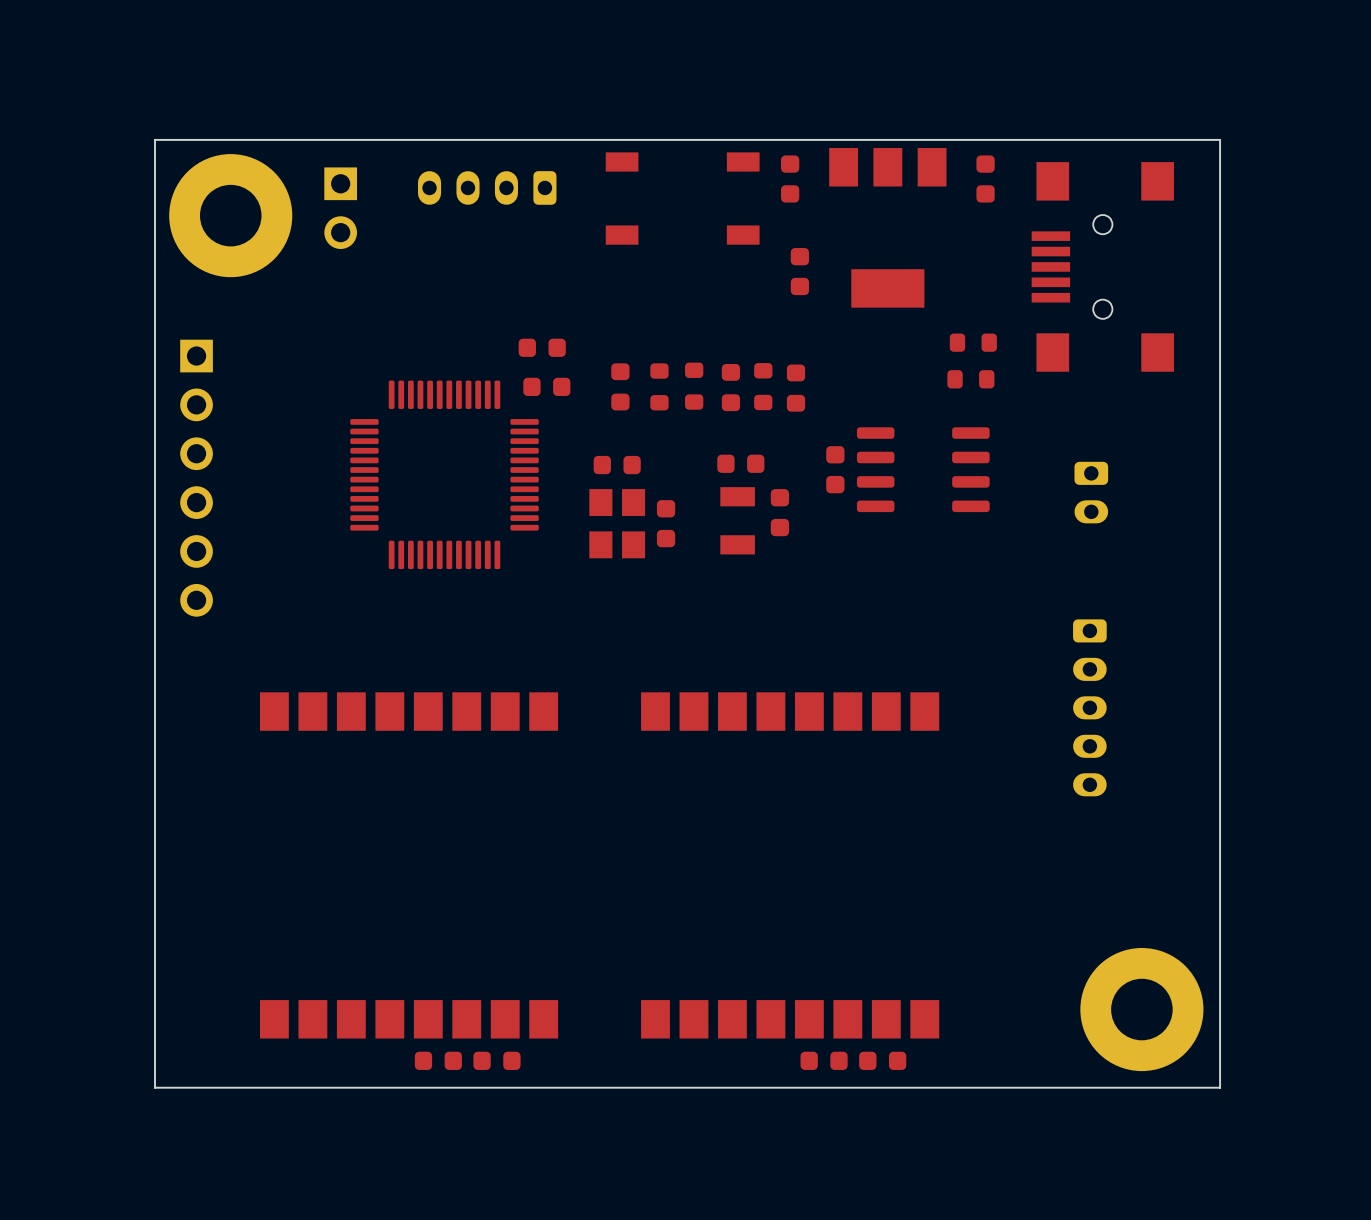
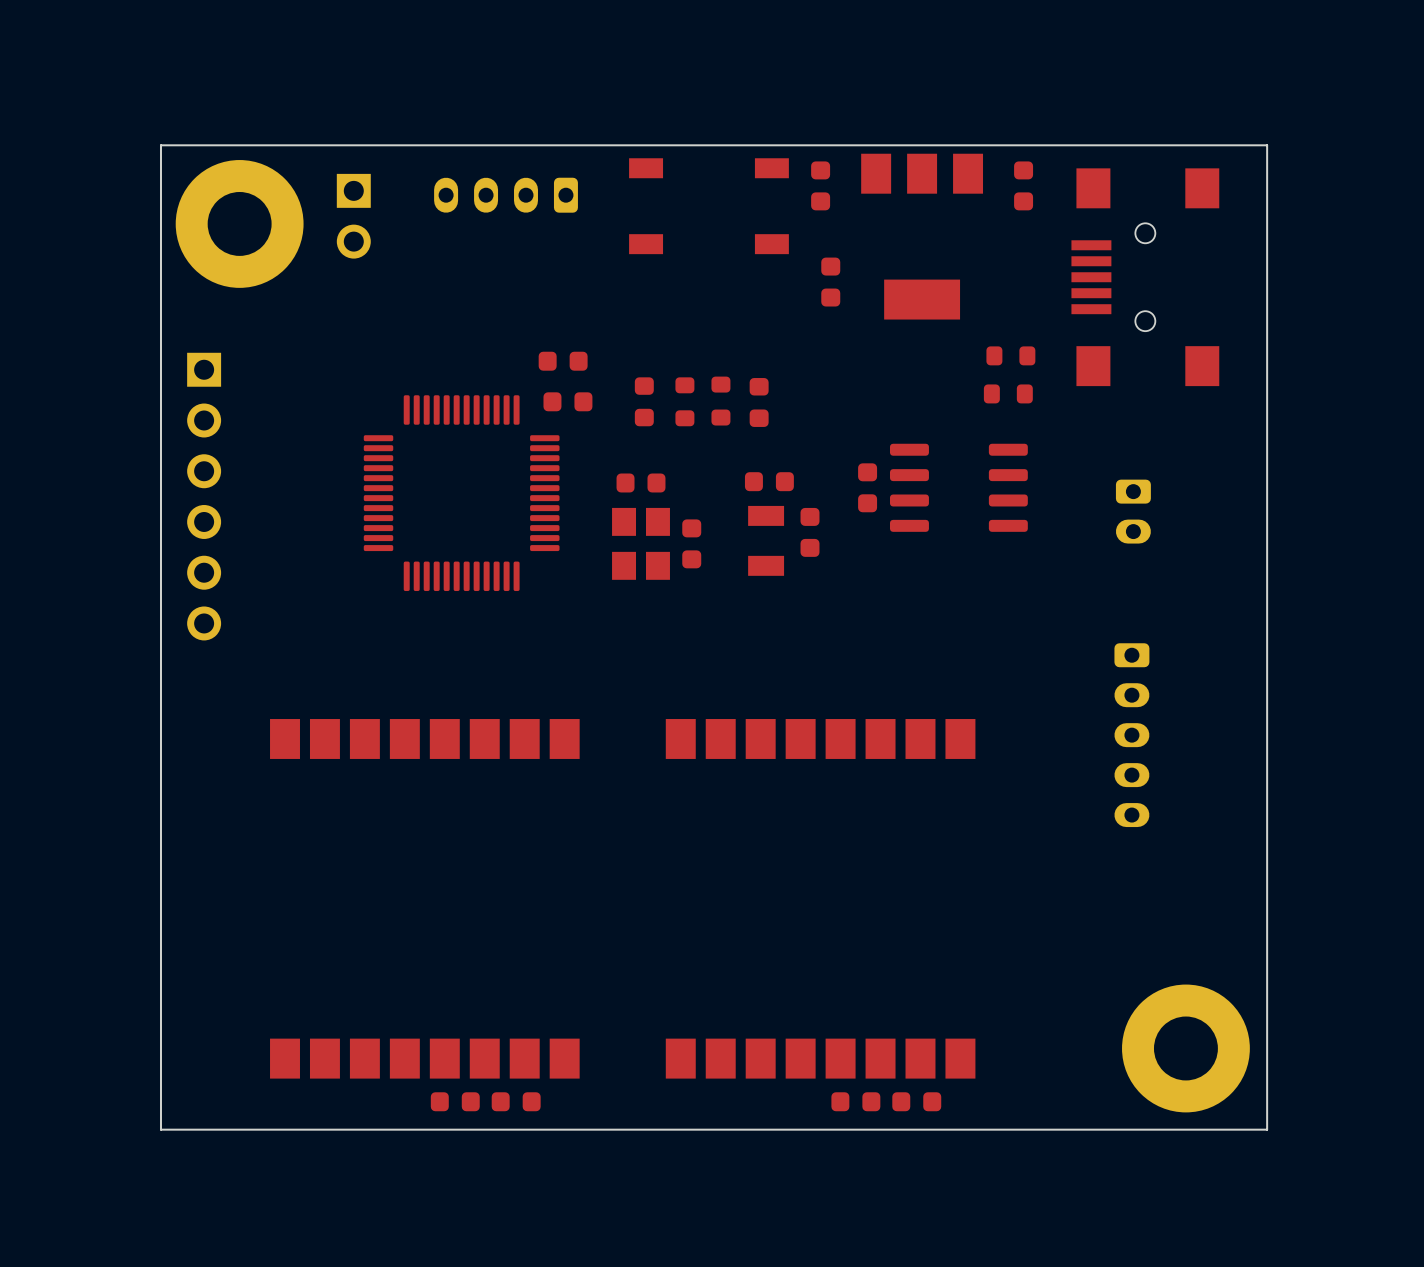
part: (763, 386) -> none
part: (796, 388) -> none

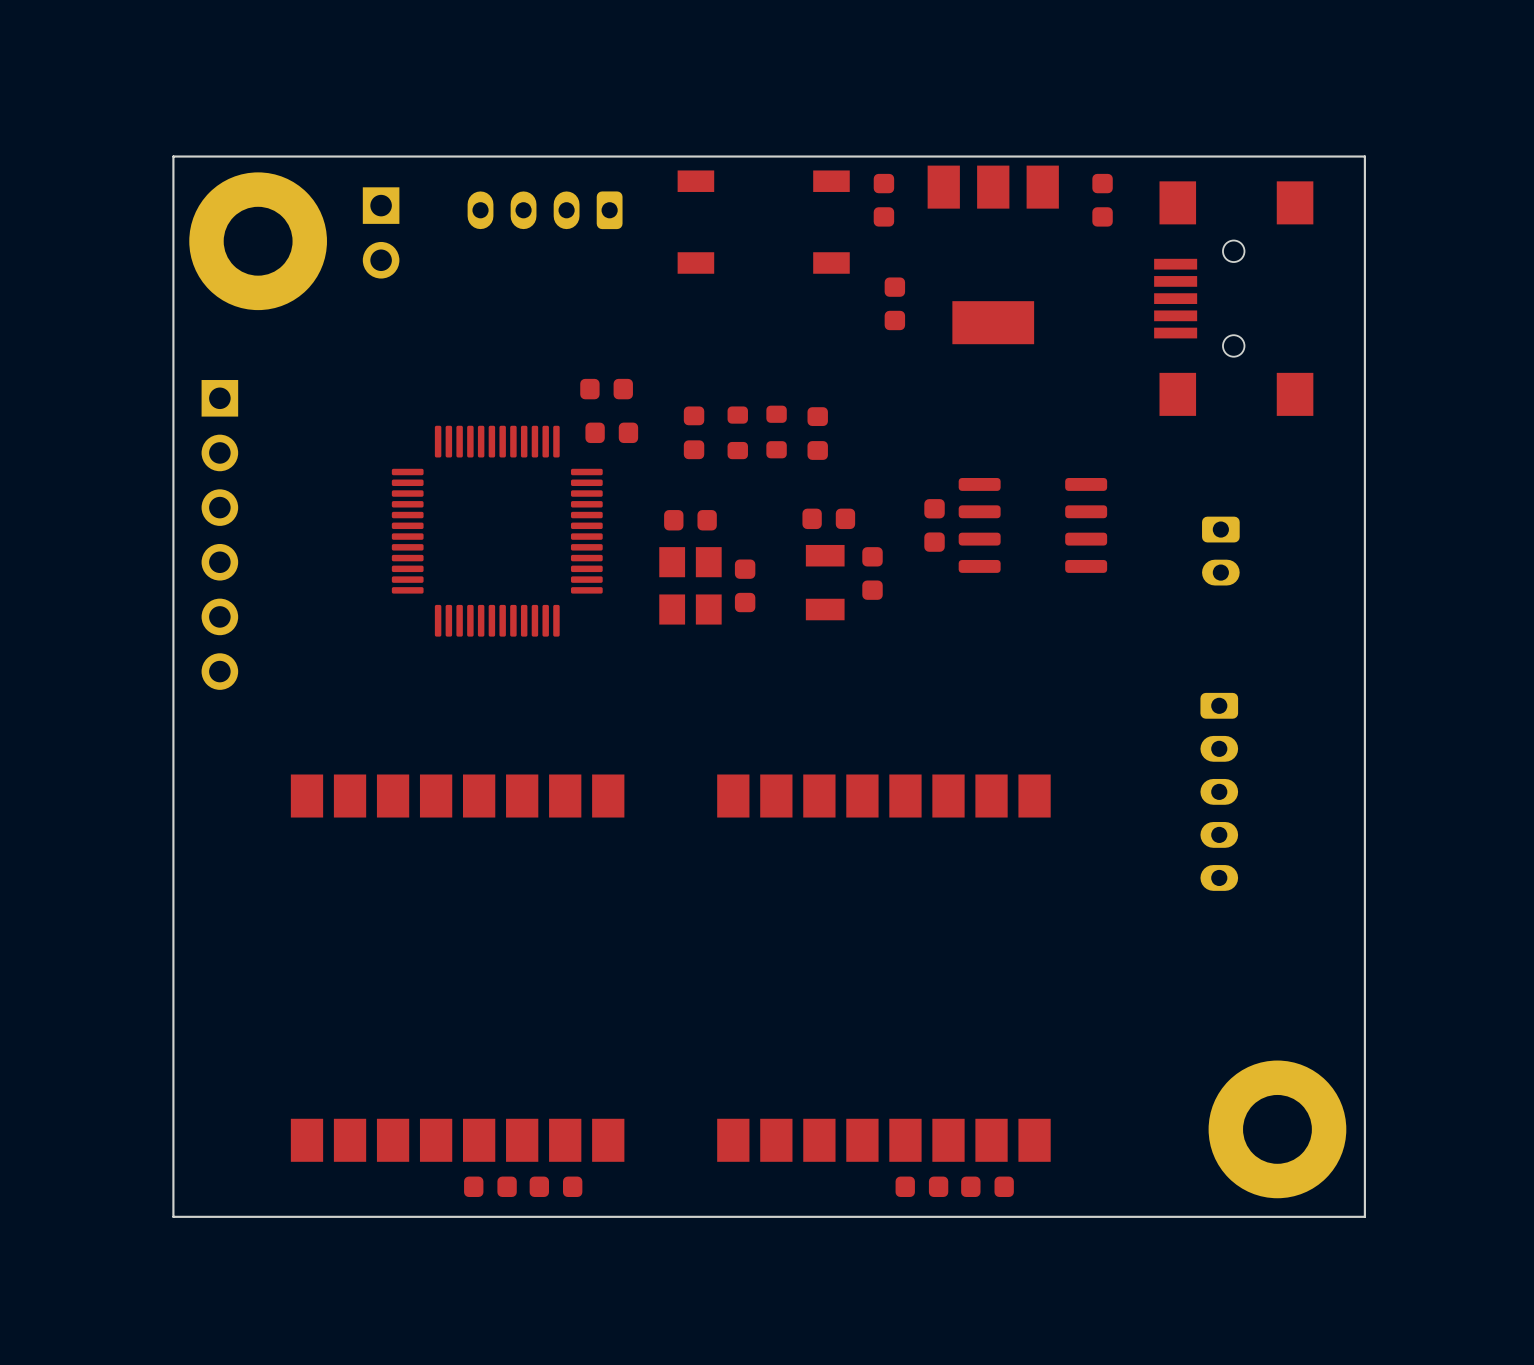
part: (1010, 355) -> none
part: (1008, 393) -> none

